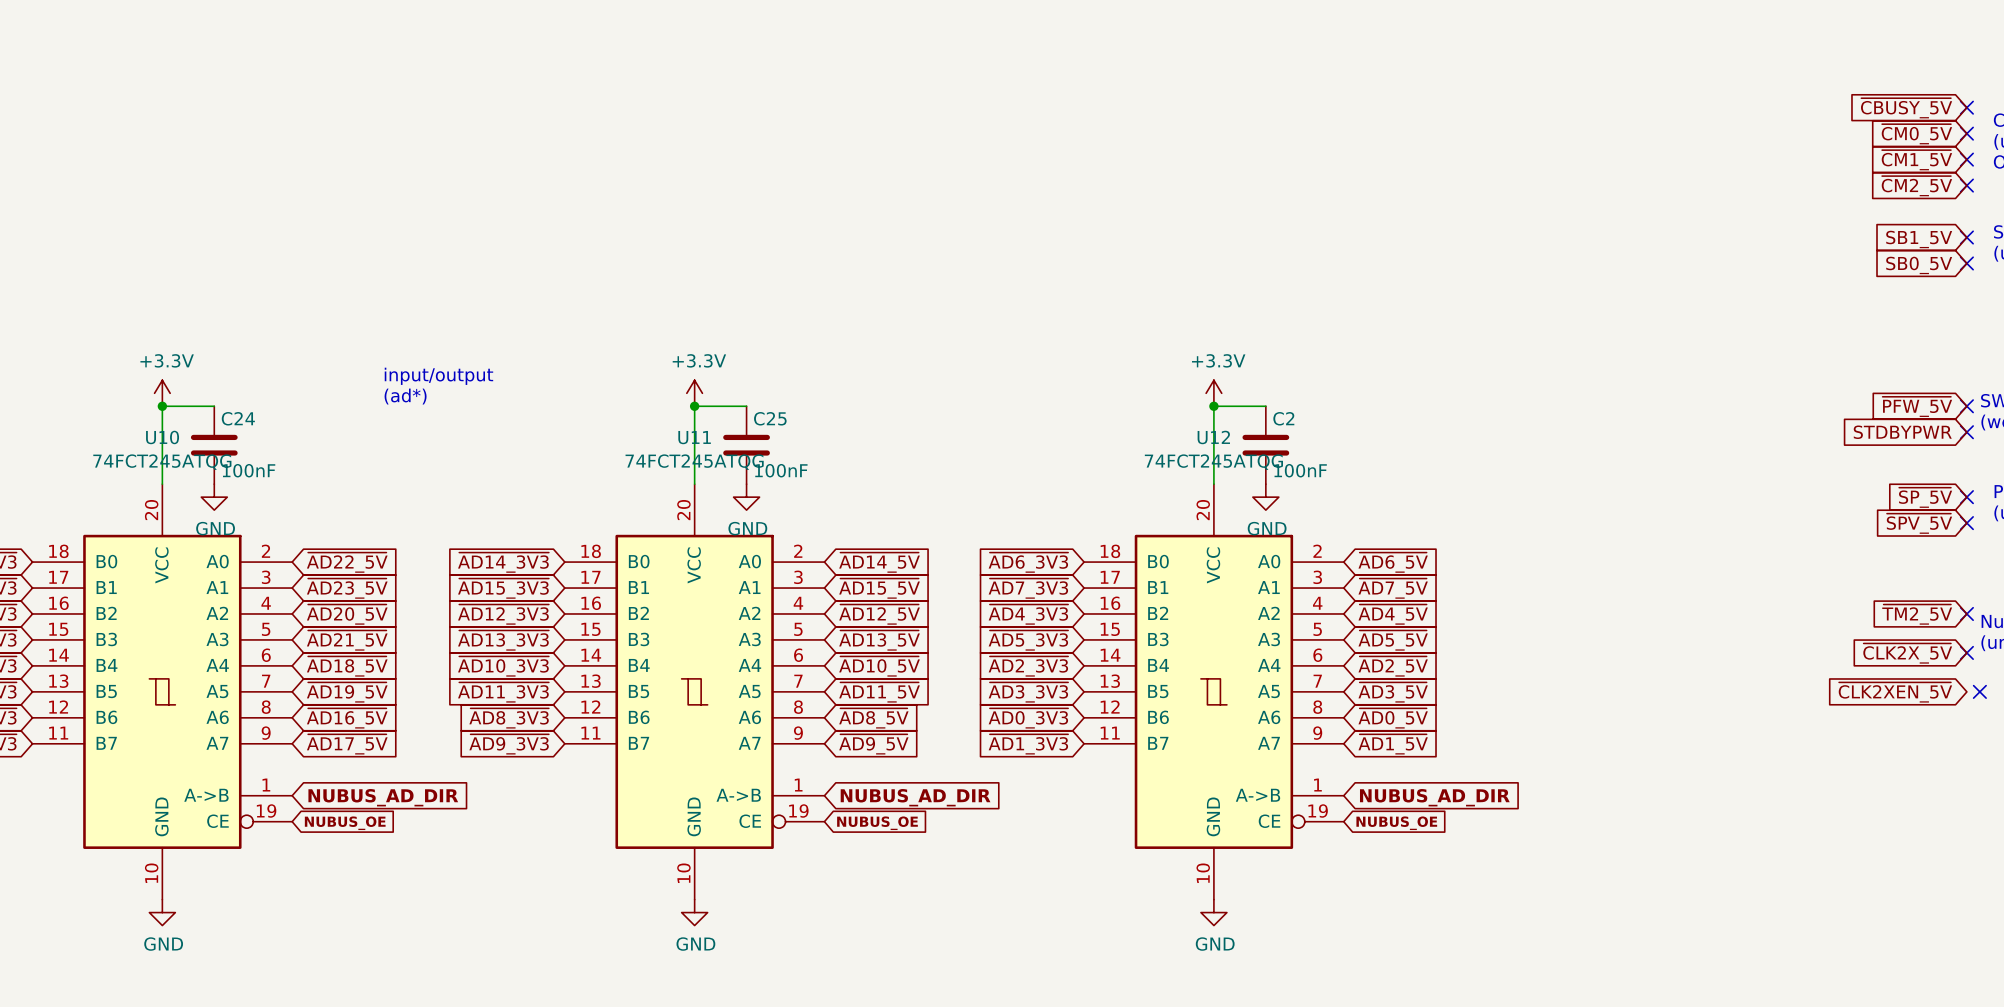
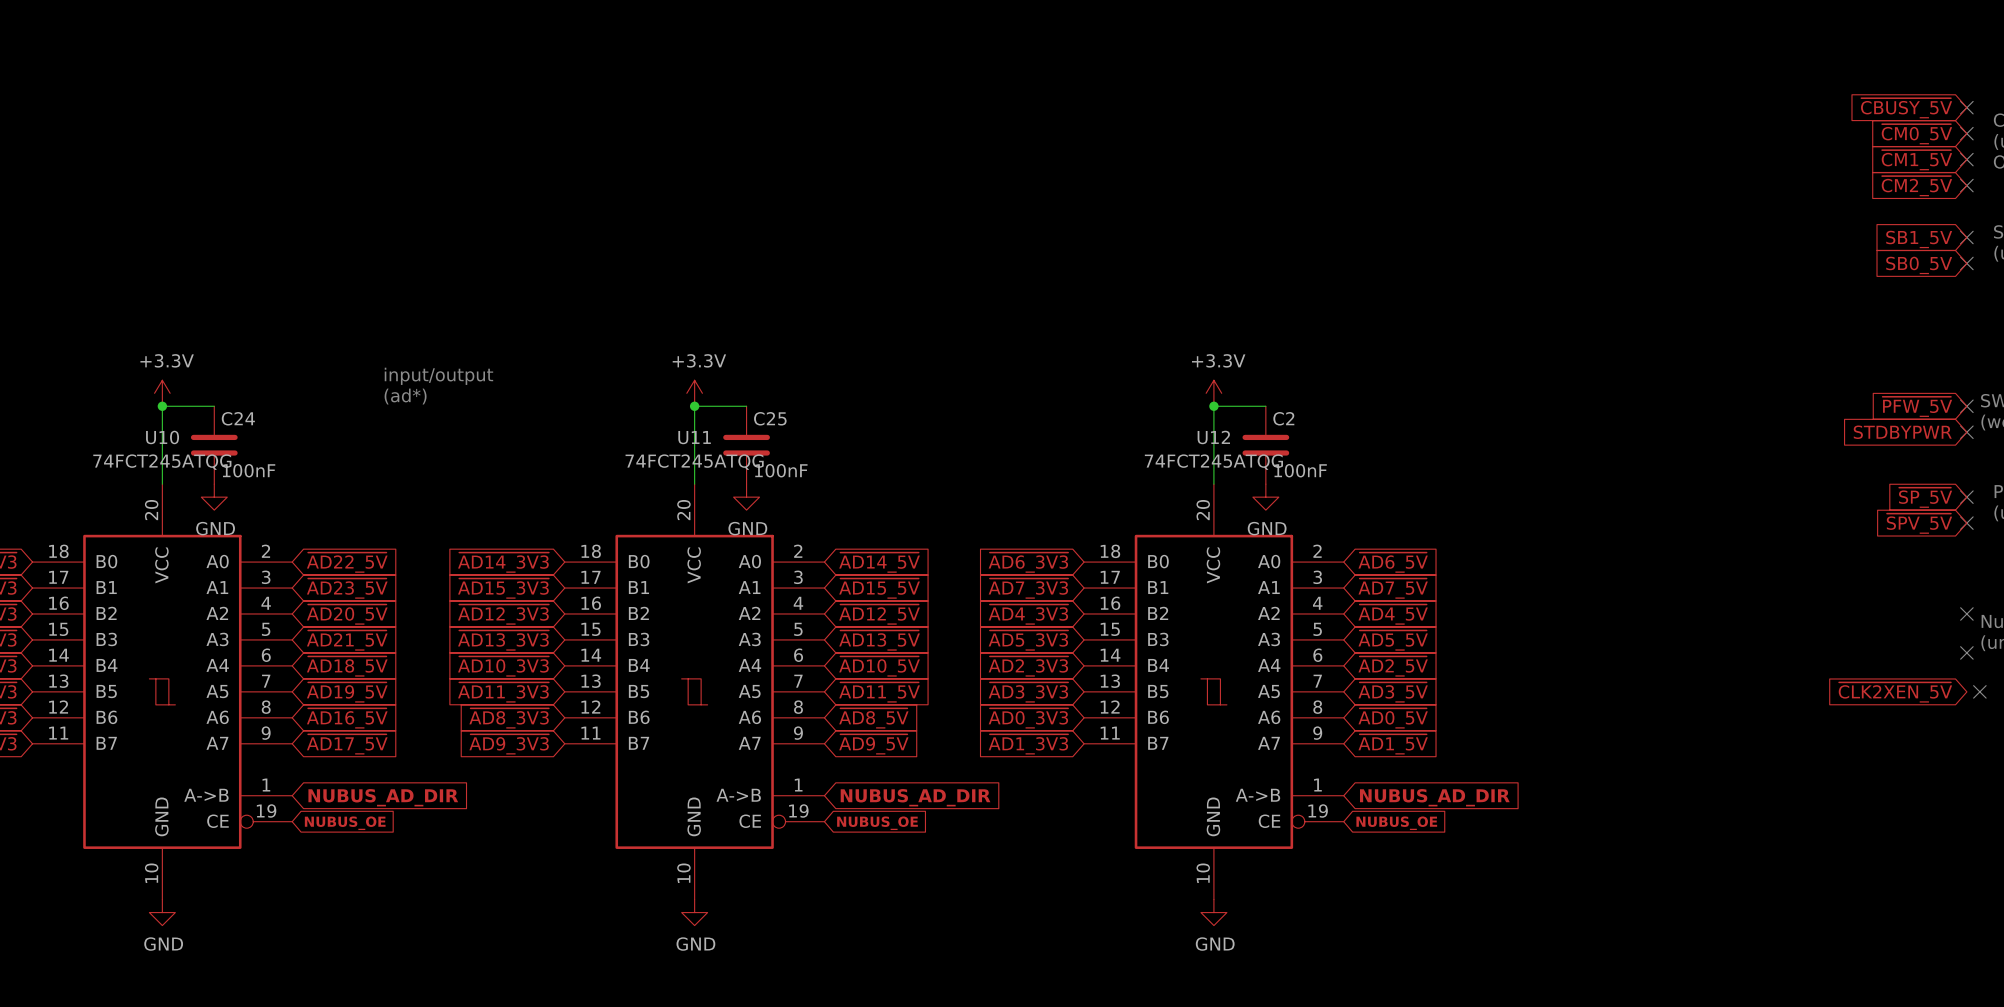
global label: ~{TM2_5V} (1917, 614) -> none
global label: ~{CLK2X_5V} (1907, 653) -> none

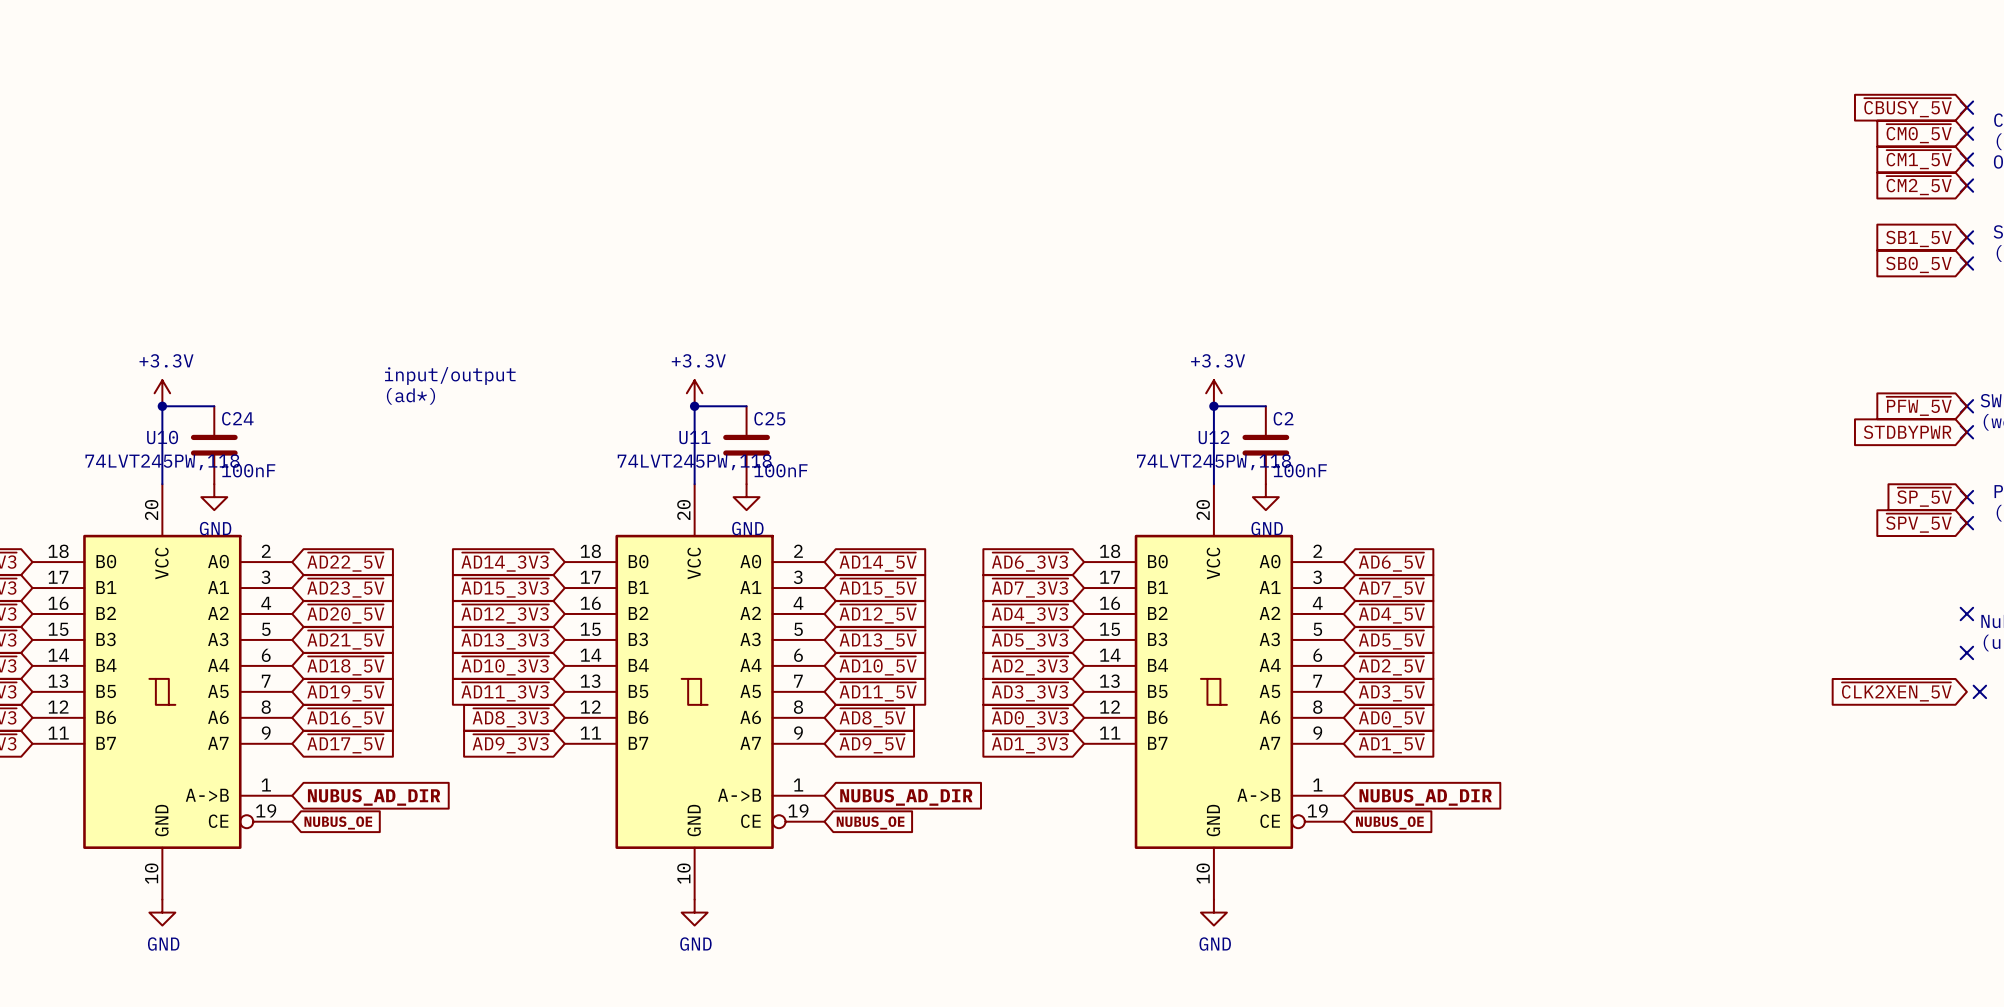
U10 value: 74FCT245ATQG (162, 462) -> 74LVT245PW,118 (162, 462)
U11 value: 74FCT245ATQG (694, 462) -> 74LVT245PW,118 (694, 462)
U12 value: 74FCT245ATQG (1213, 462) -> 74LVT245PW,118 (1214, 462)

